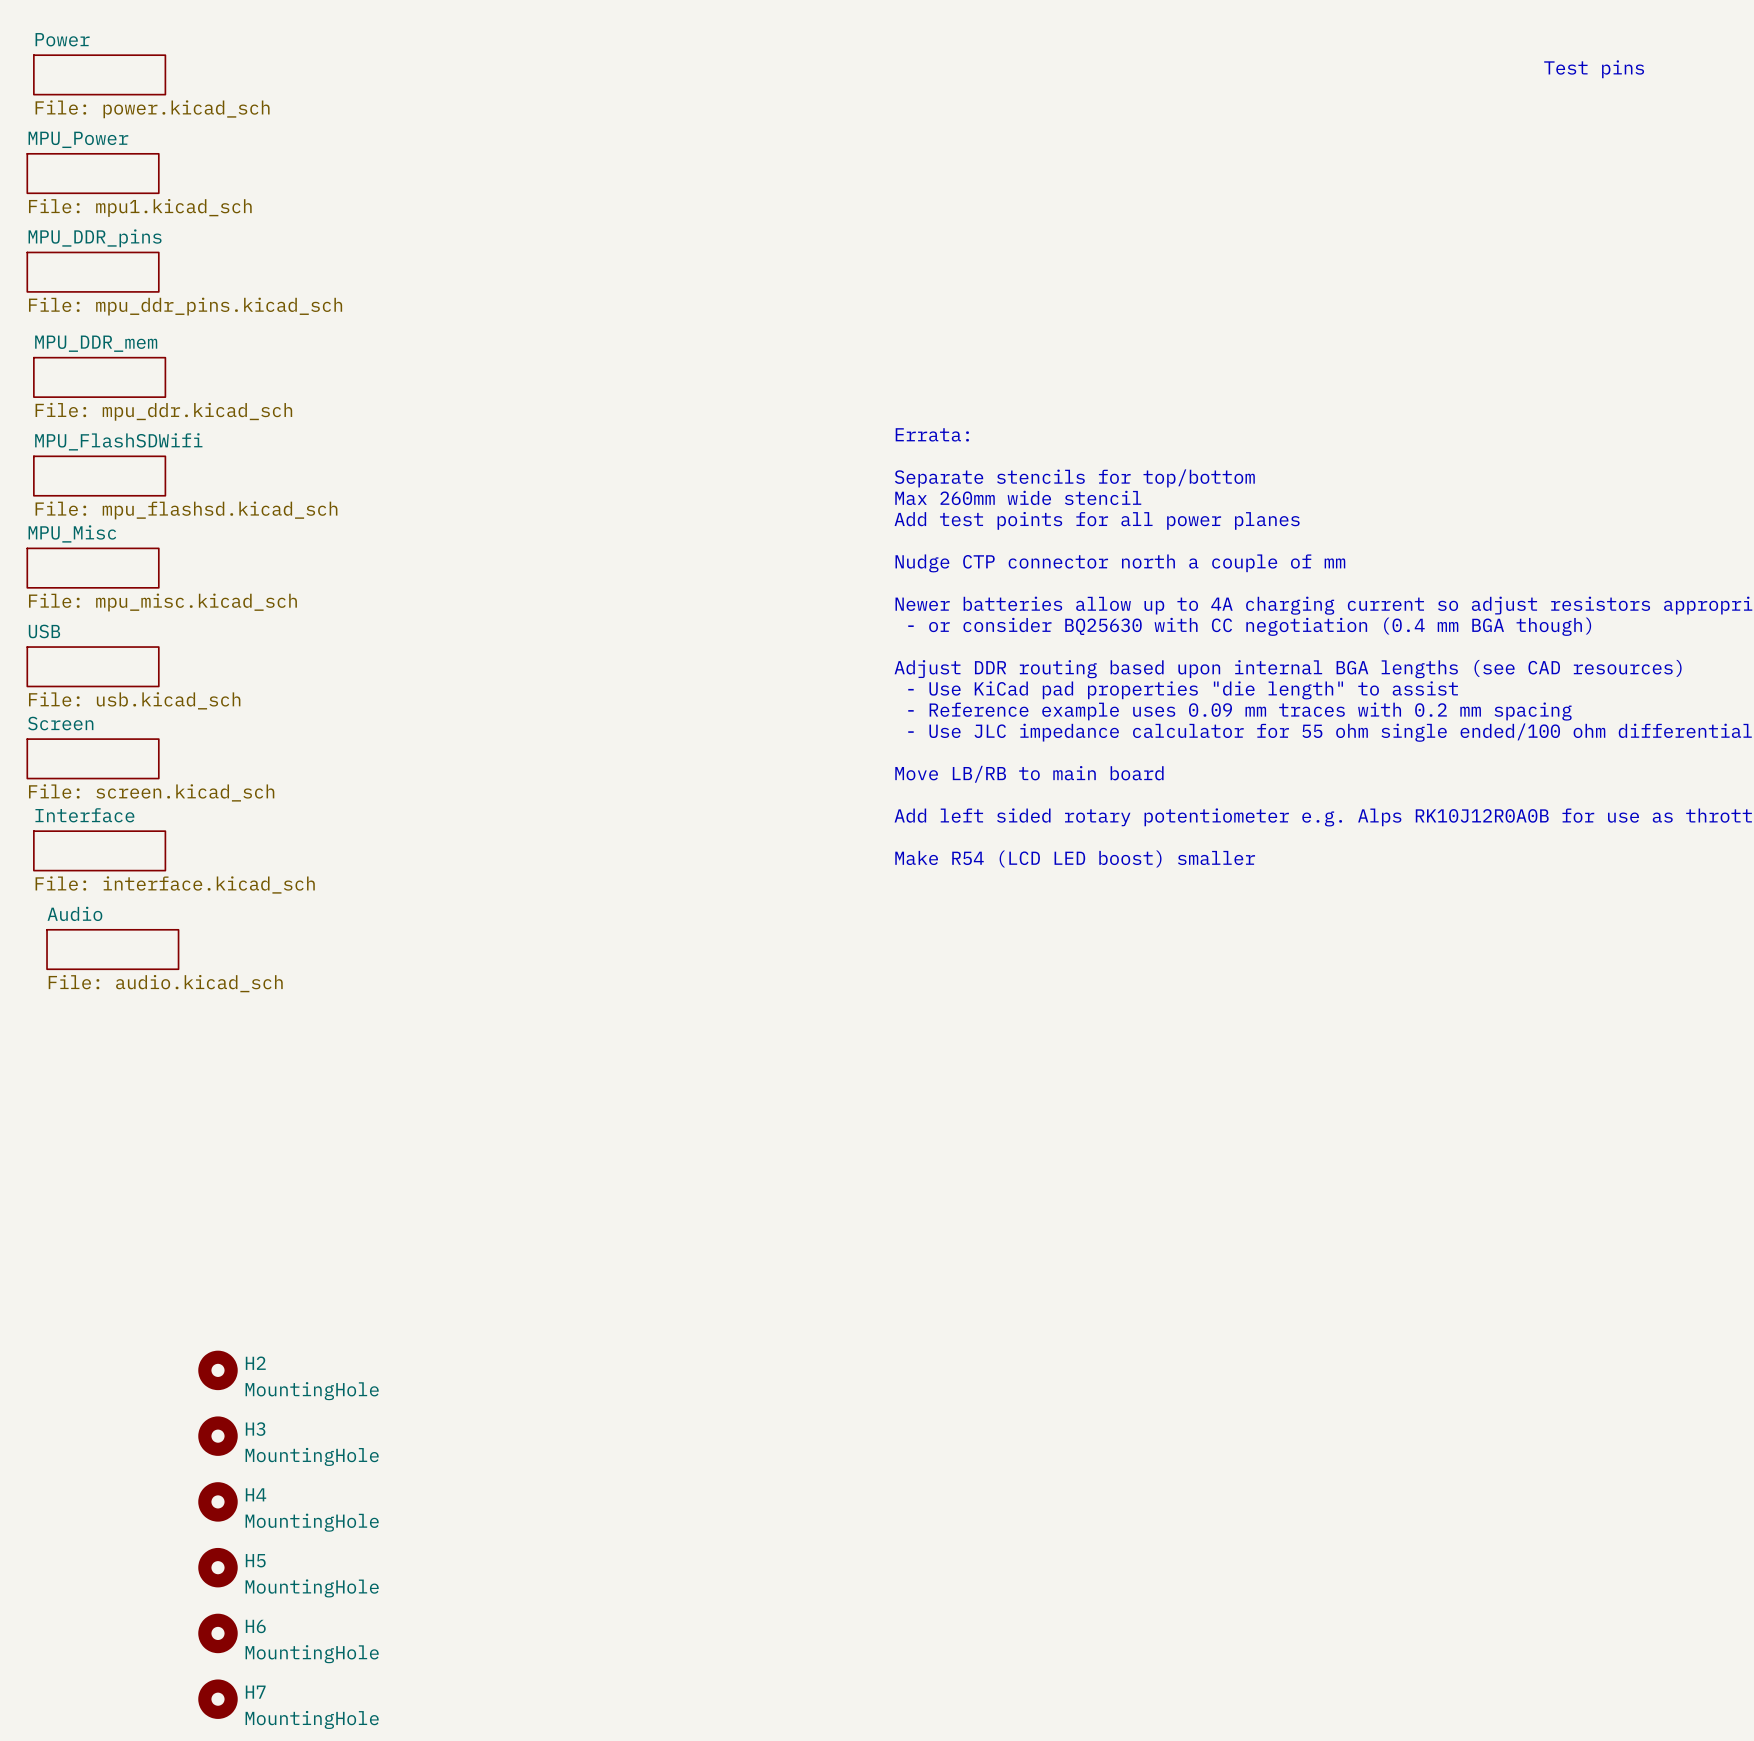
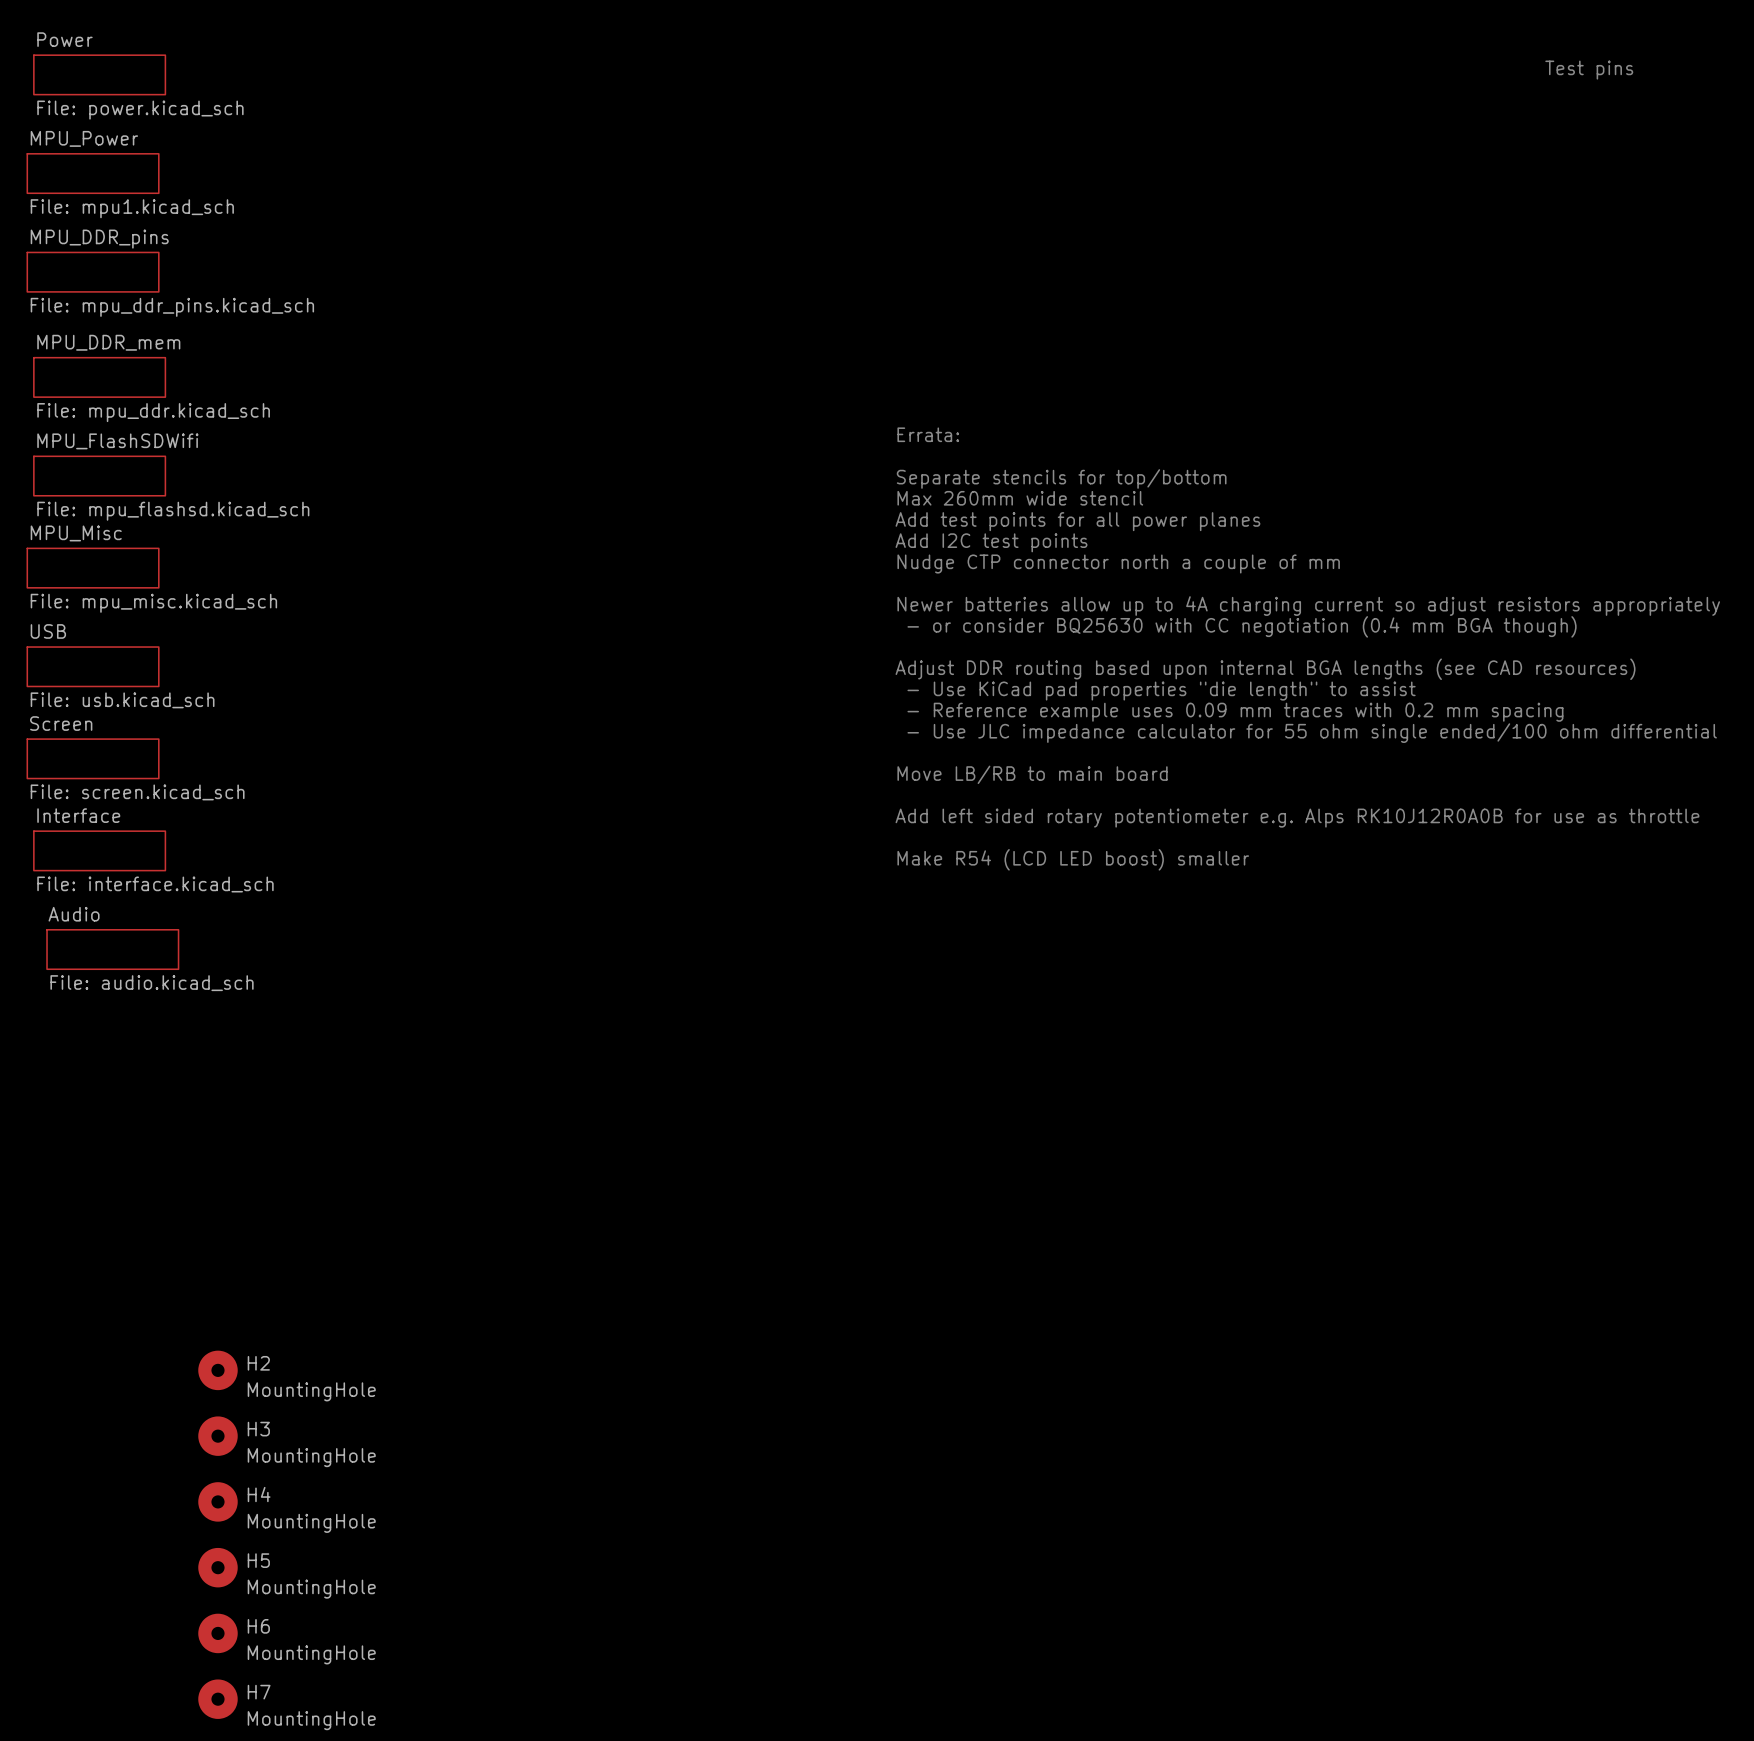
text: none -> Add I2C test points (991, 542)

